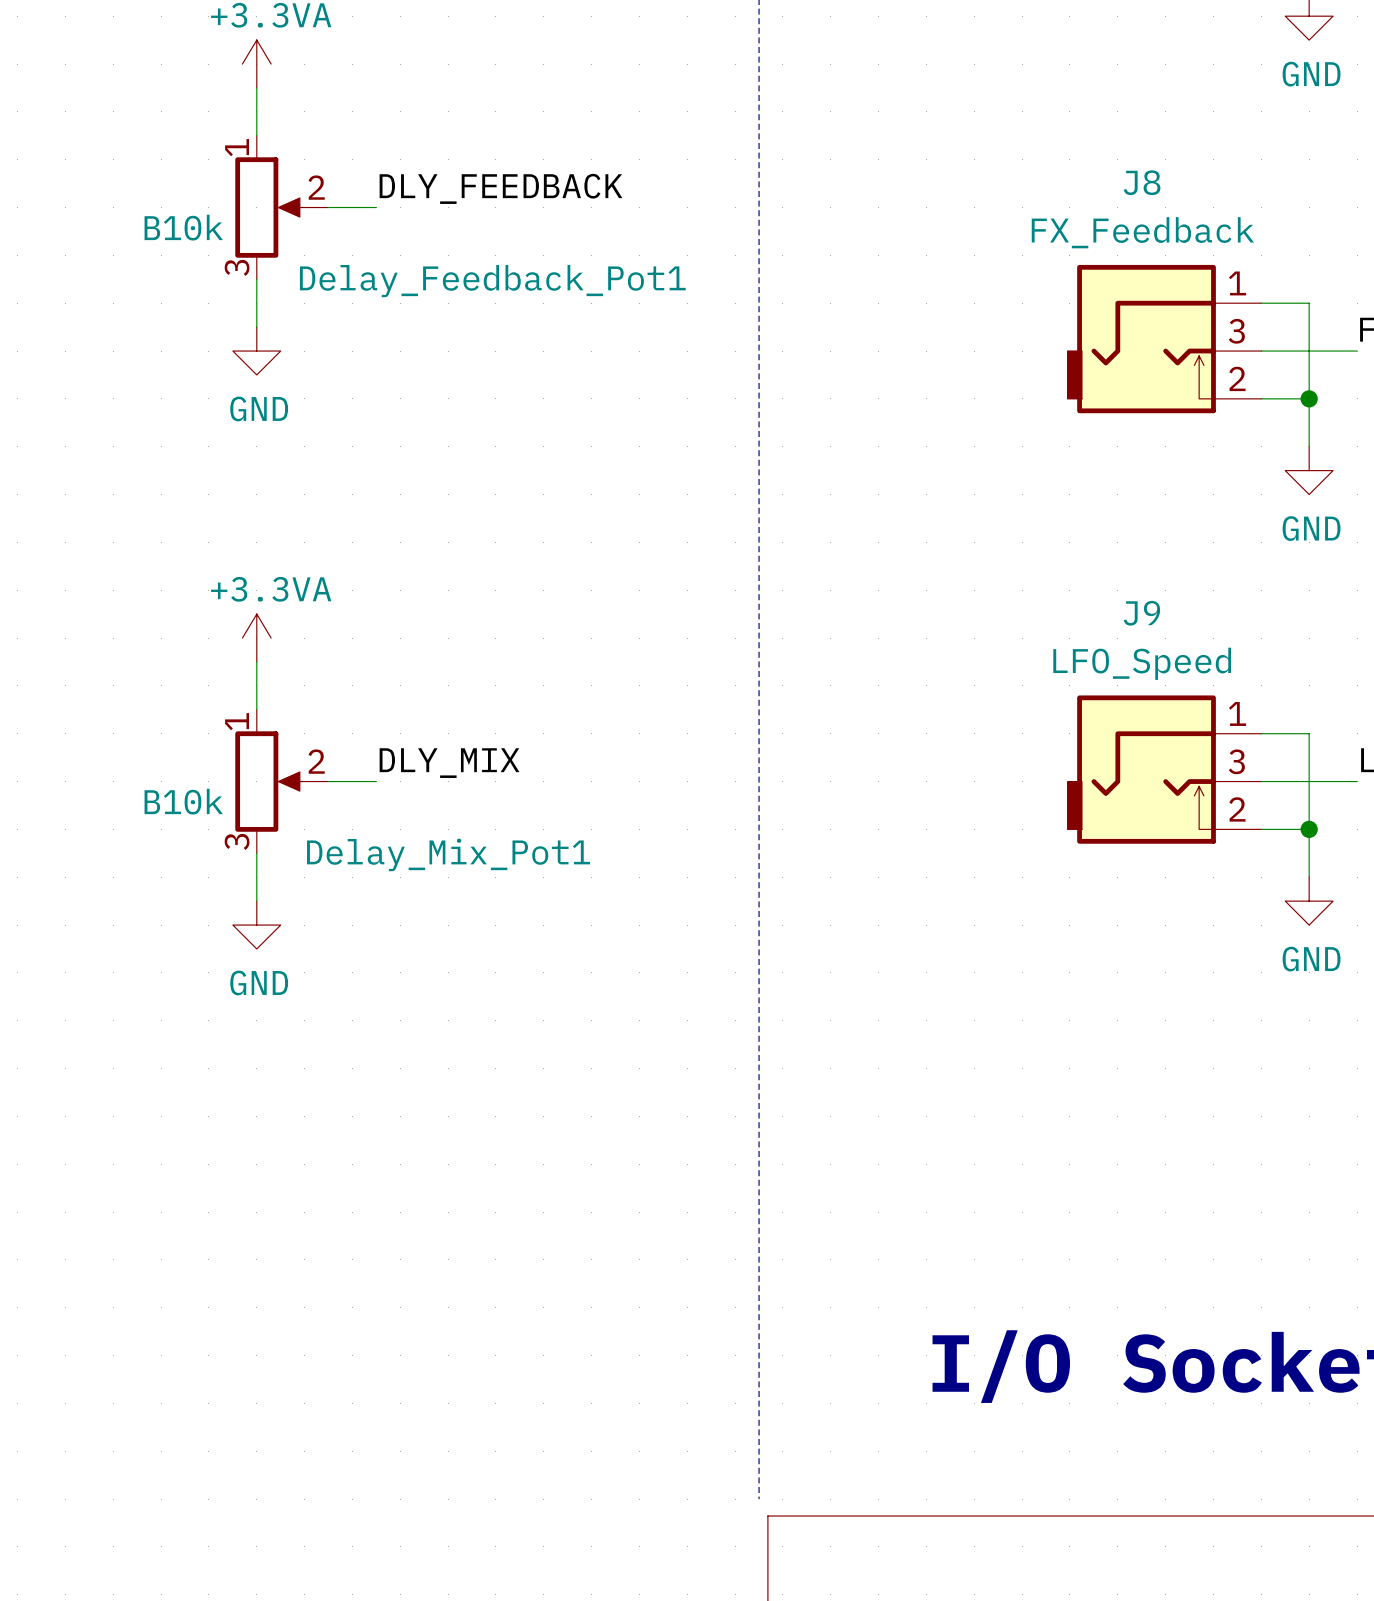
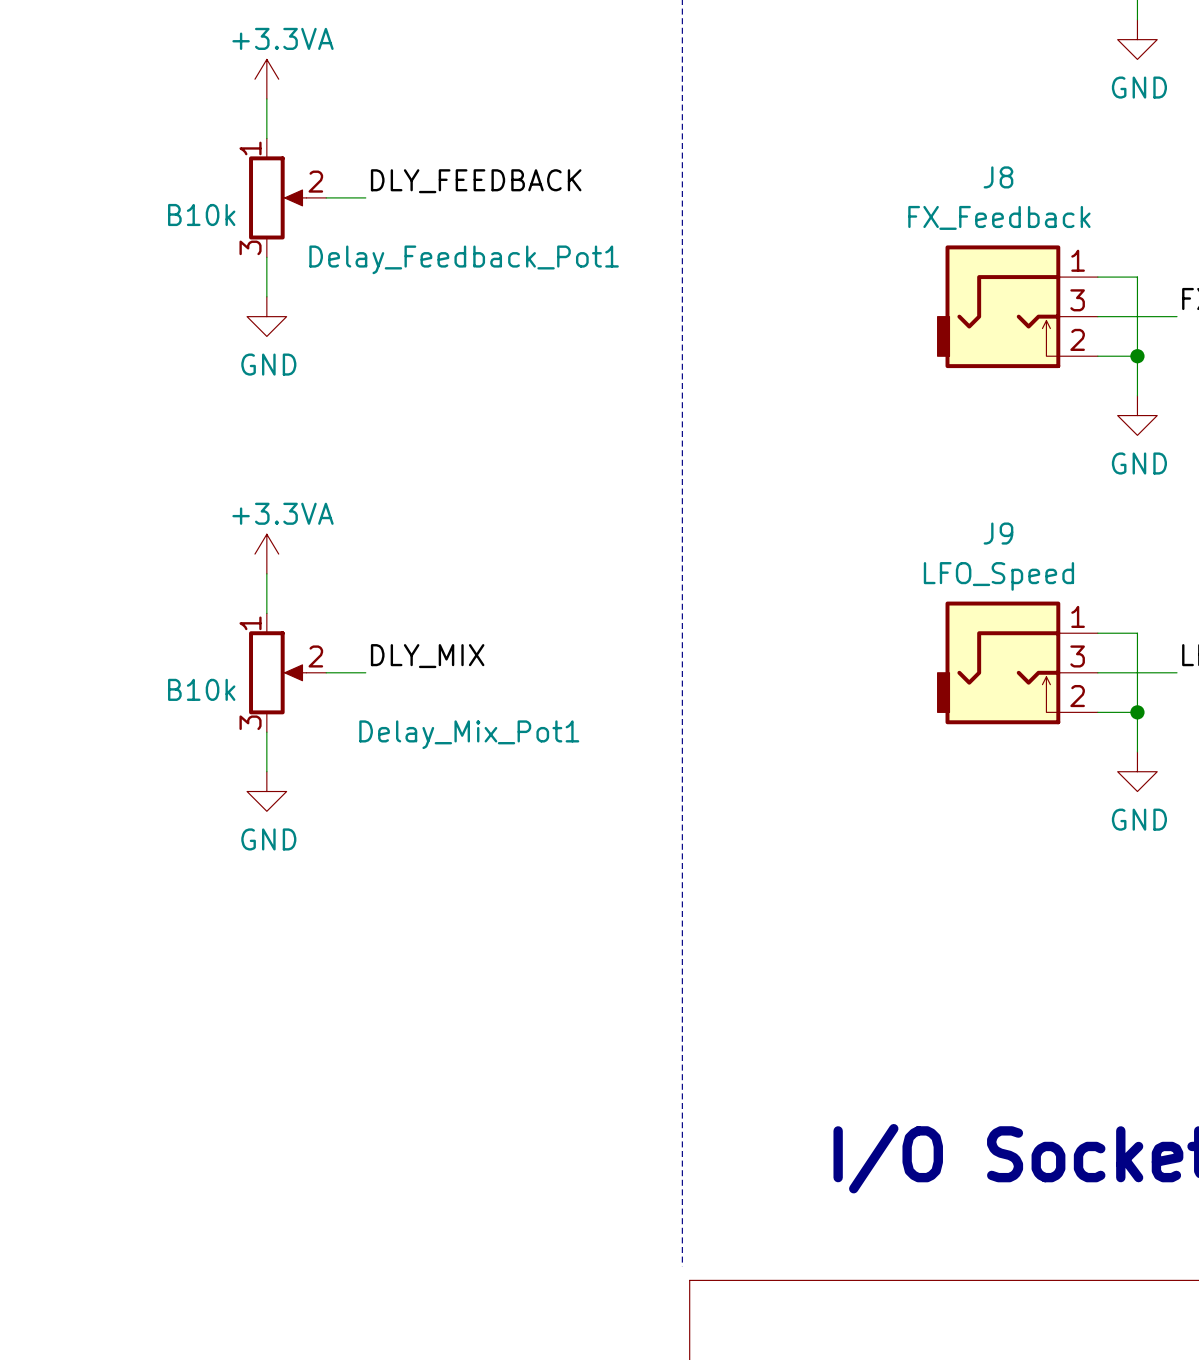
Delay_Mix_Pot1 name position: Delay_Mix_Pot1 (448, 854) -> Delay_Mix_Pot1 (469, 734)

